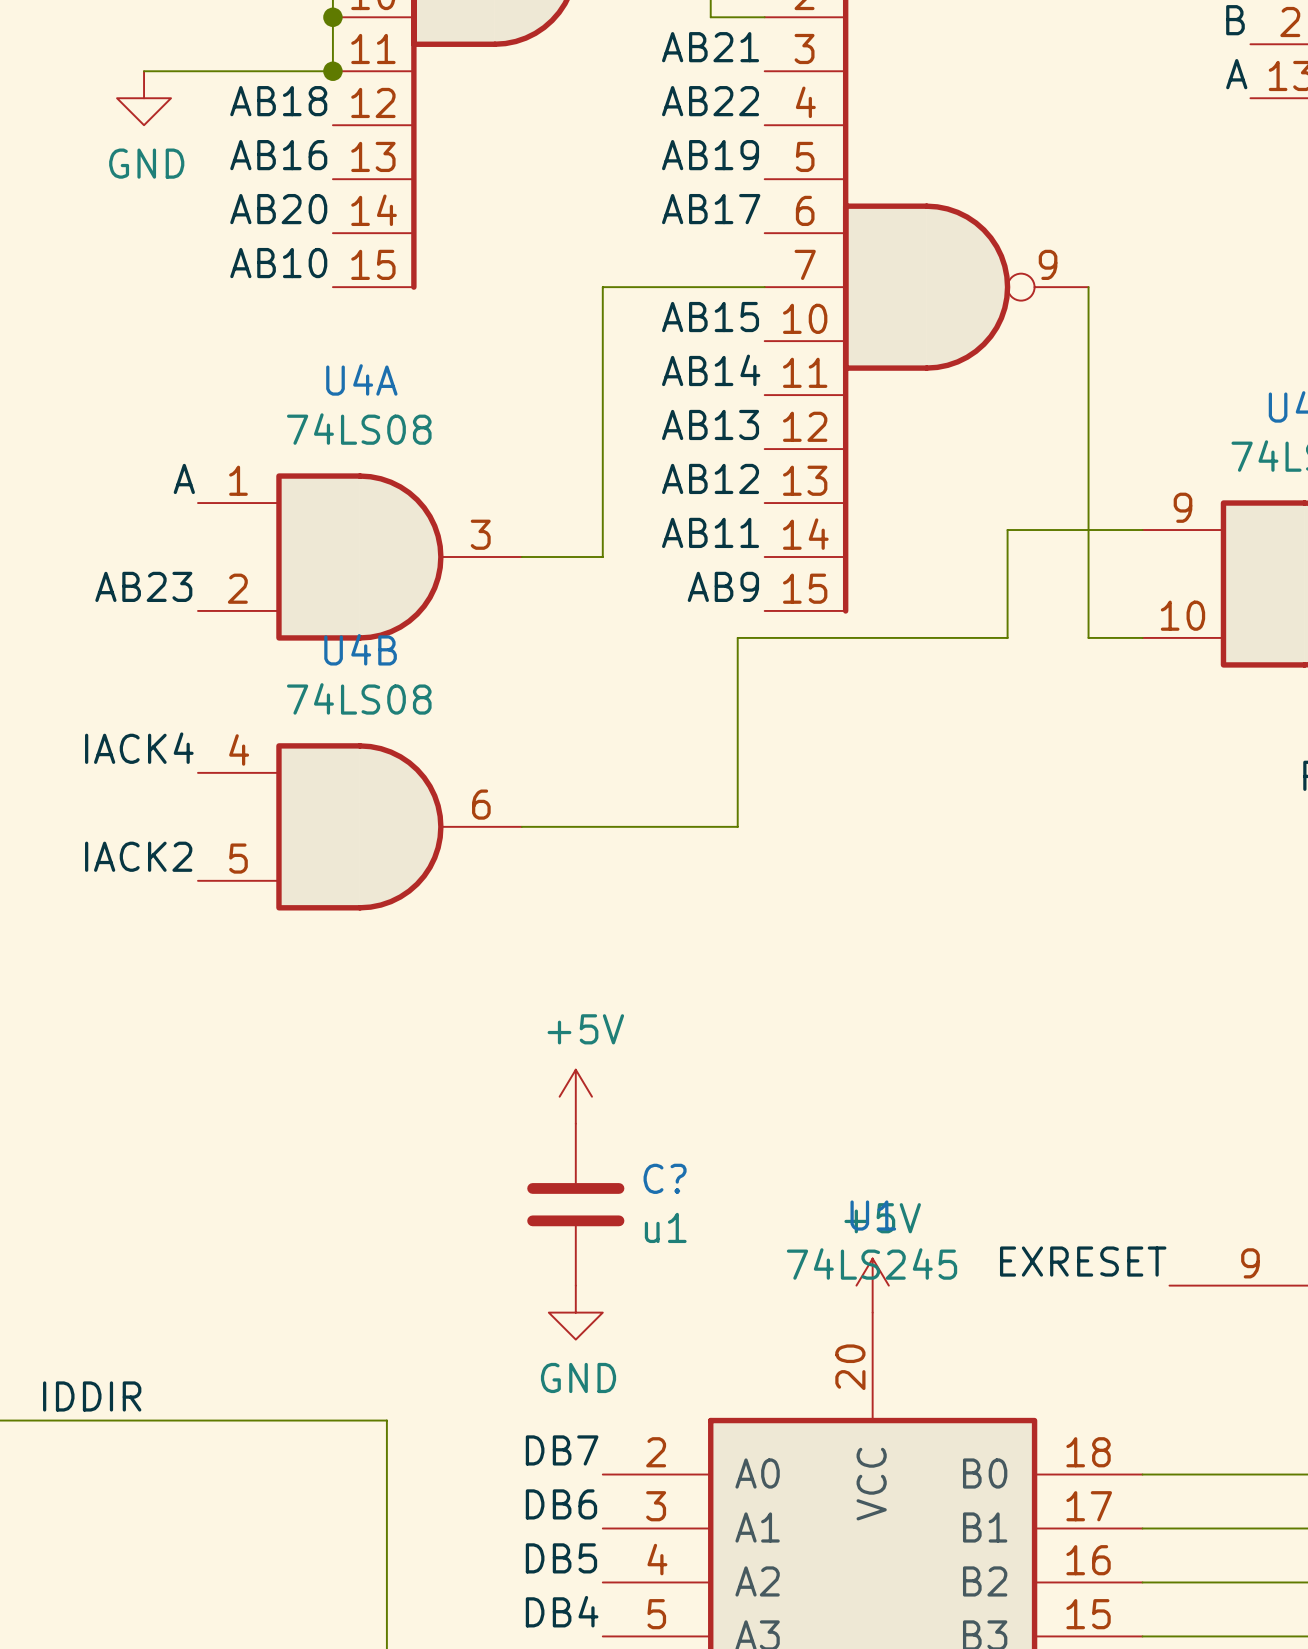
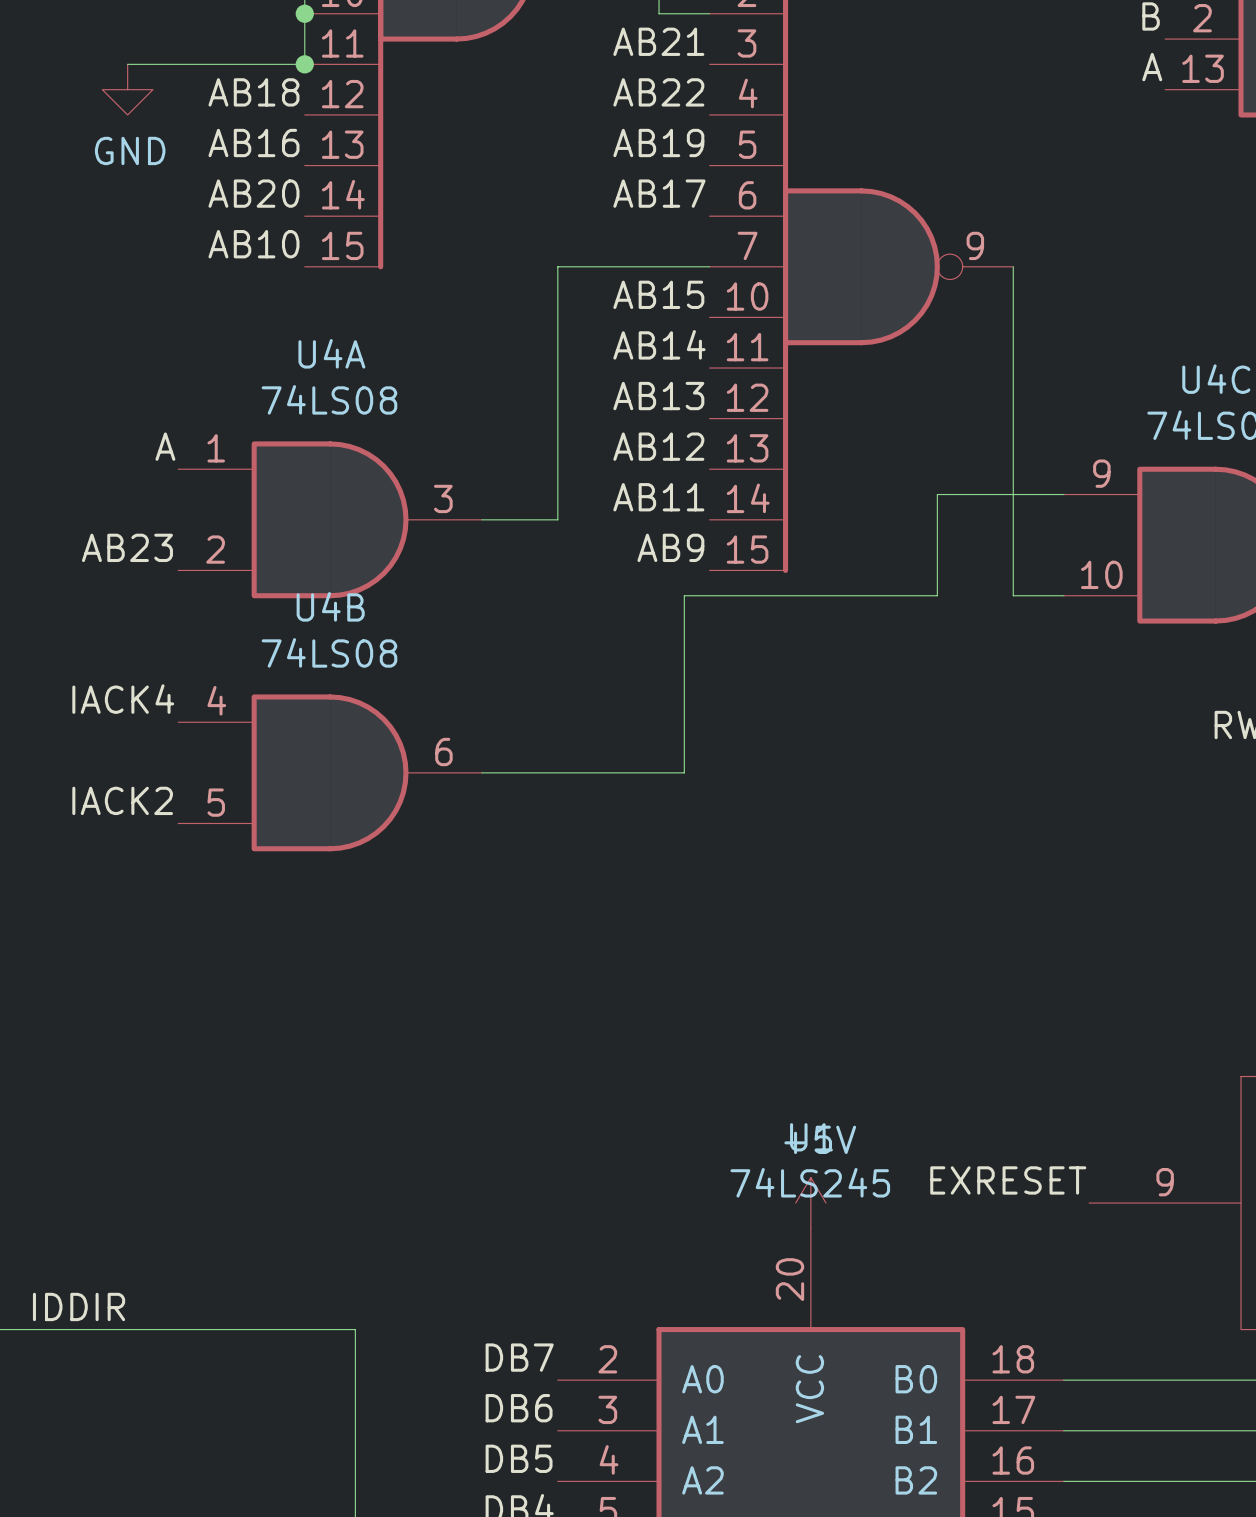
power symbol: +5V (575, 1096) -> none
C?: u1 (575, 1204) -> none
power symbol: GND (575, 1312) -> none

